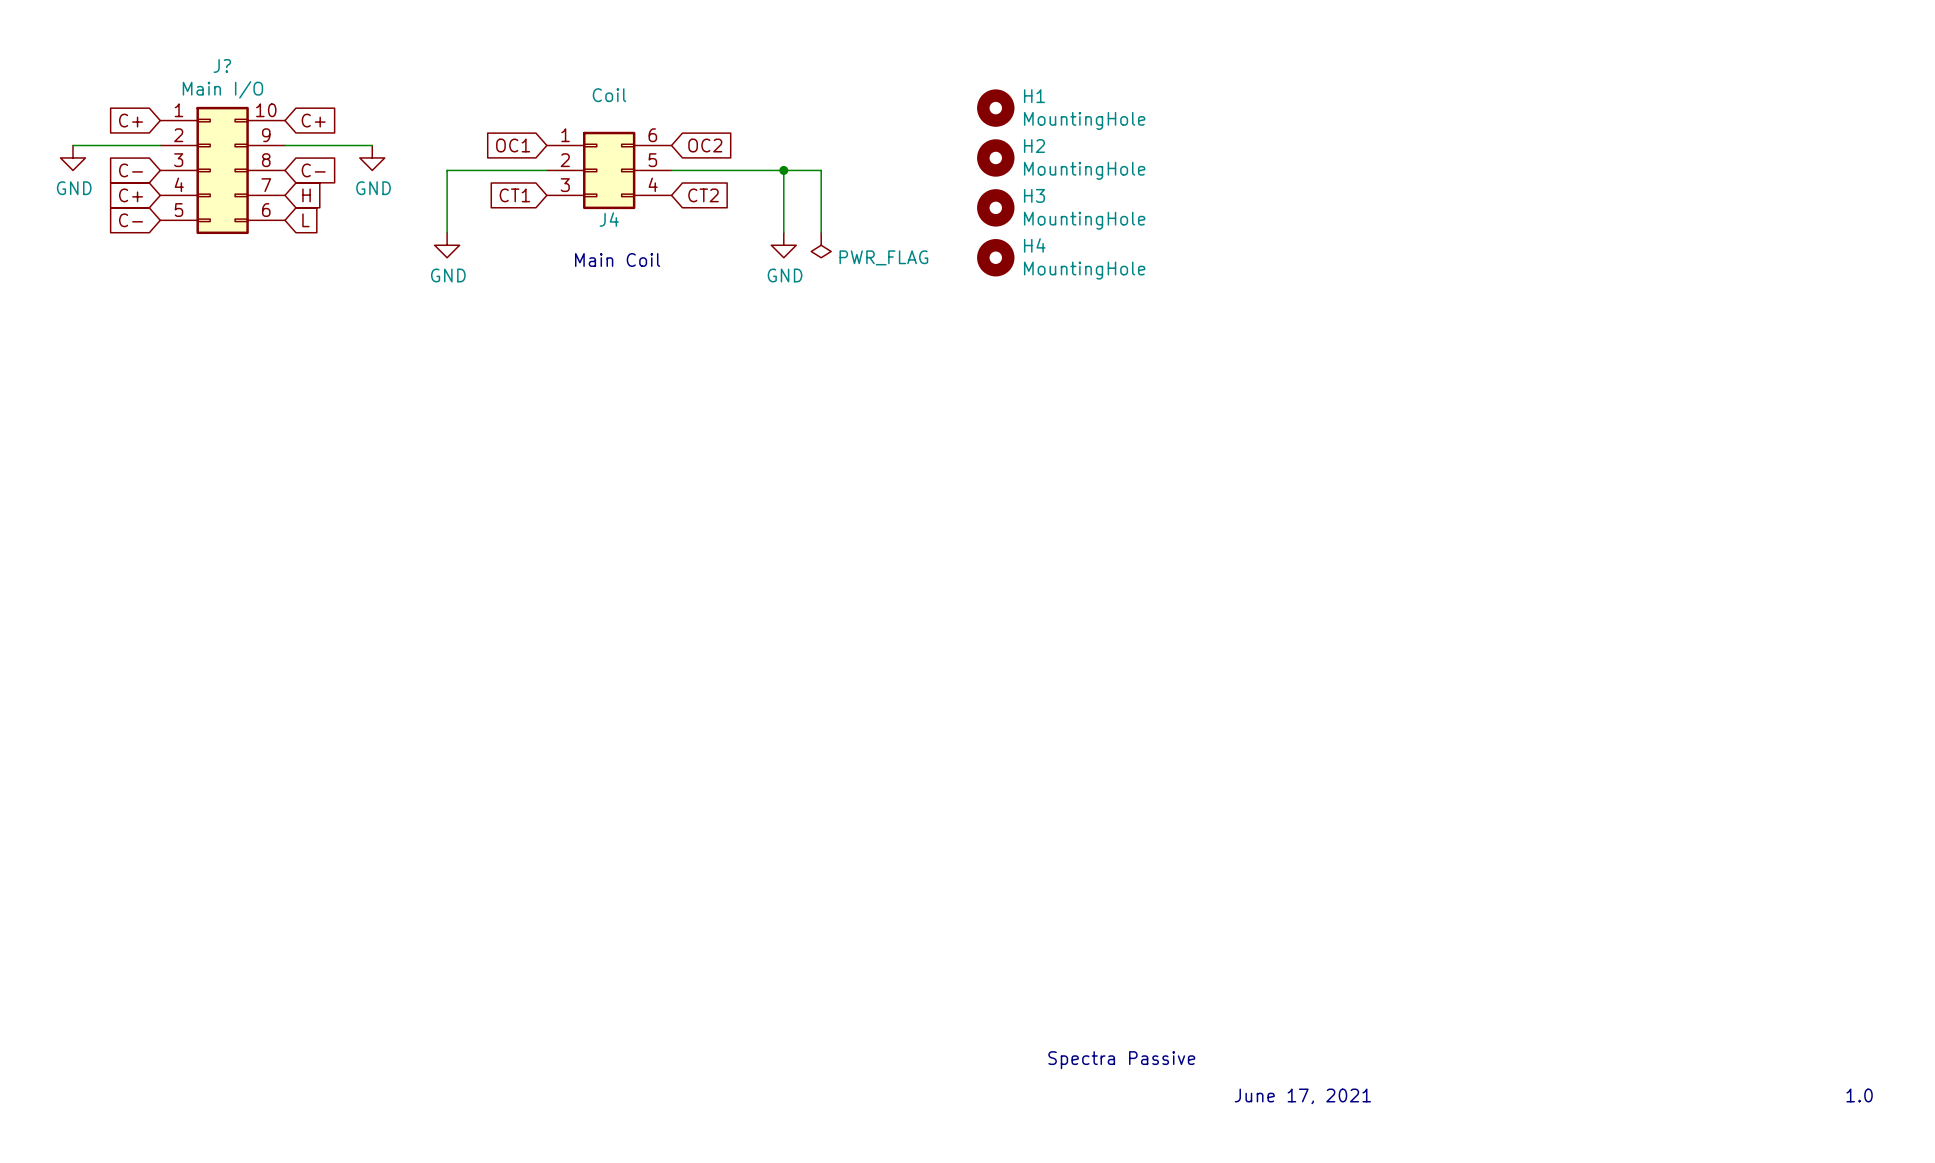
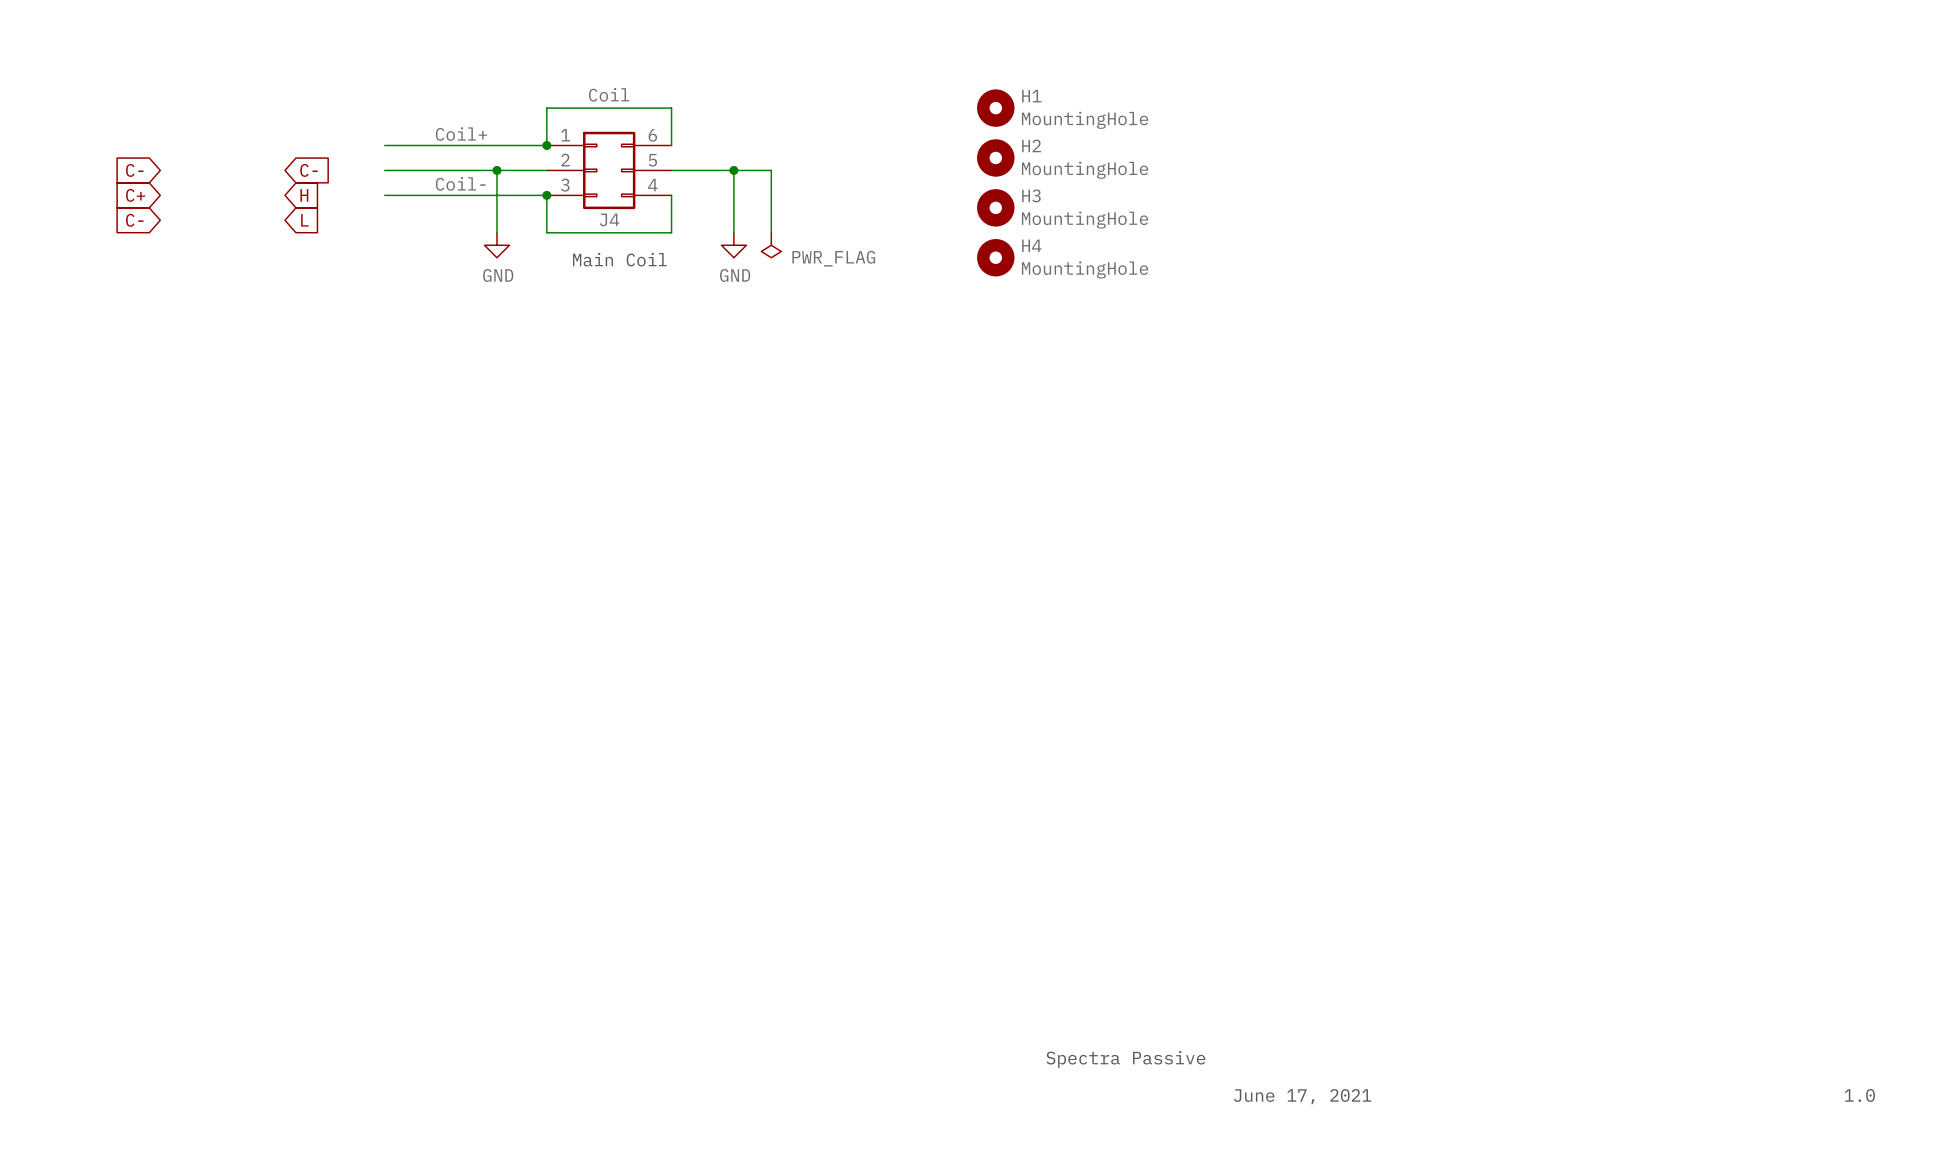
global label: C+ (131, 120) -> none
global label: C+ (313, 120) -> none
label: none -> Coil+ (461, 134)
wire: (72, 145) (160, 145) -> none
wire: (284, 145) (372, 145) -> none
wire: none -> (384, 145) (546, 145) (546, 108) (671, 108) (671, 145)
global label: OC1 (513, 145) -> none
junction: none -> (546, 145)
global label: OC2 (705, 145) -> none
power symbol: GND (72, 157) -> none
power symbol: GND (372, 157) -> none
J?: Main I/O (222, 170) -> none
wire: (447, 170) (447, 232) -> (447, 170) (384, 170)
wire: none -> (496, 170) (496, 232)
junction: none -> (496, 170)
wire: (771, 170) (821, 170) (821, 232) -> (771, 170) (771, 232)
wire: (783, 170) (783, 232) -> (733, 170) (733, 232)
junction position: (783, 170) -> (733, 170)
label: none -> Coil- (460, 183)
wire: none -> (384, 195) (546, 195) (546, 232) (671, 232) (671, 195)
global label: CT1 (514, 195) -> none
junction: none -> (546, 195)
global label: CT2 (703, 195) -> none
power symbol position: GND (447, 245) -> GND (496, 245)
power symbol position: GND (783, 245) -> GND (733, 245)
power symbol position: PWR_FLAG (821, 245) -> PWR_FLAG (771, 245)

